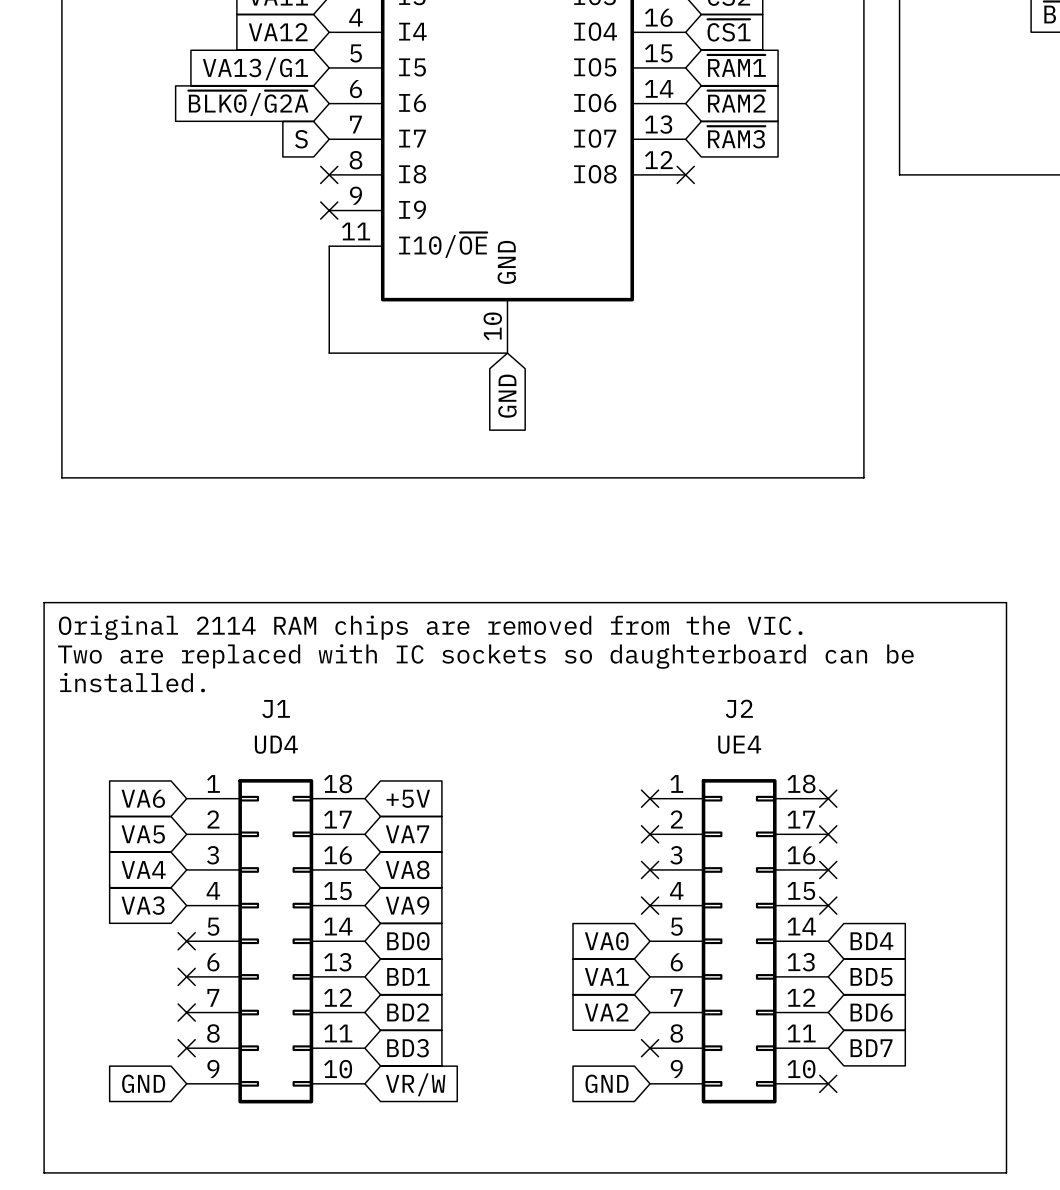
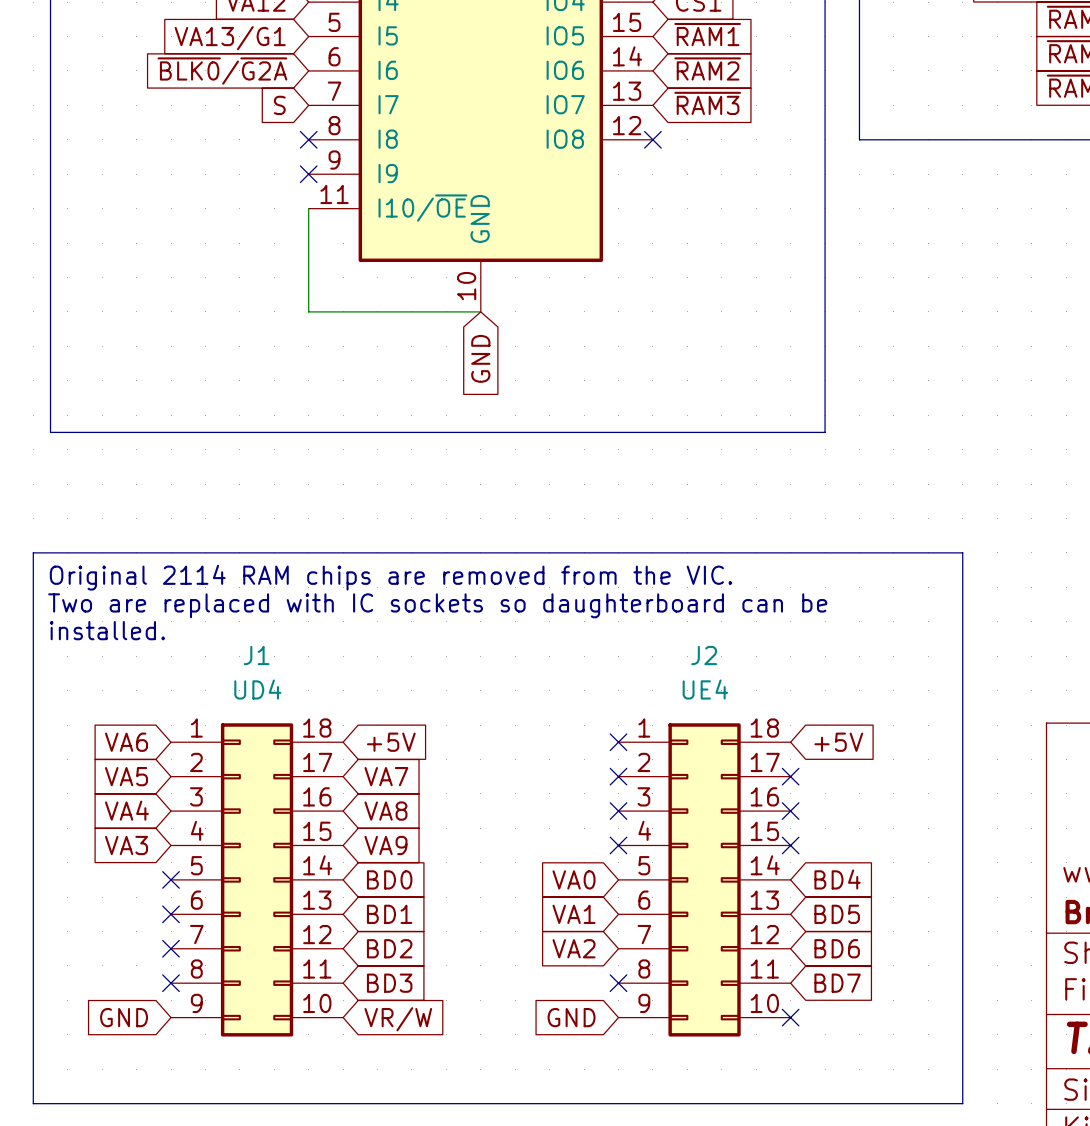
no-connect mark: (828, 798) -> none
global label: none -> +5V (838, 742)

